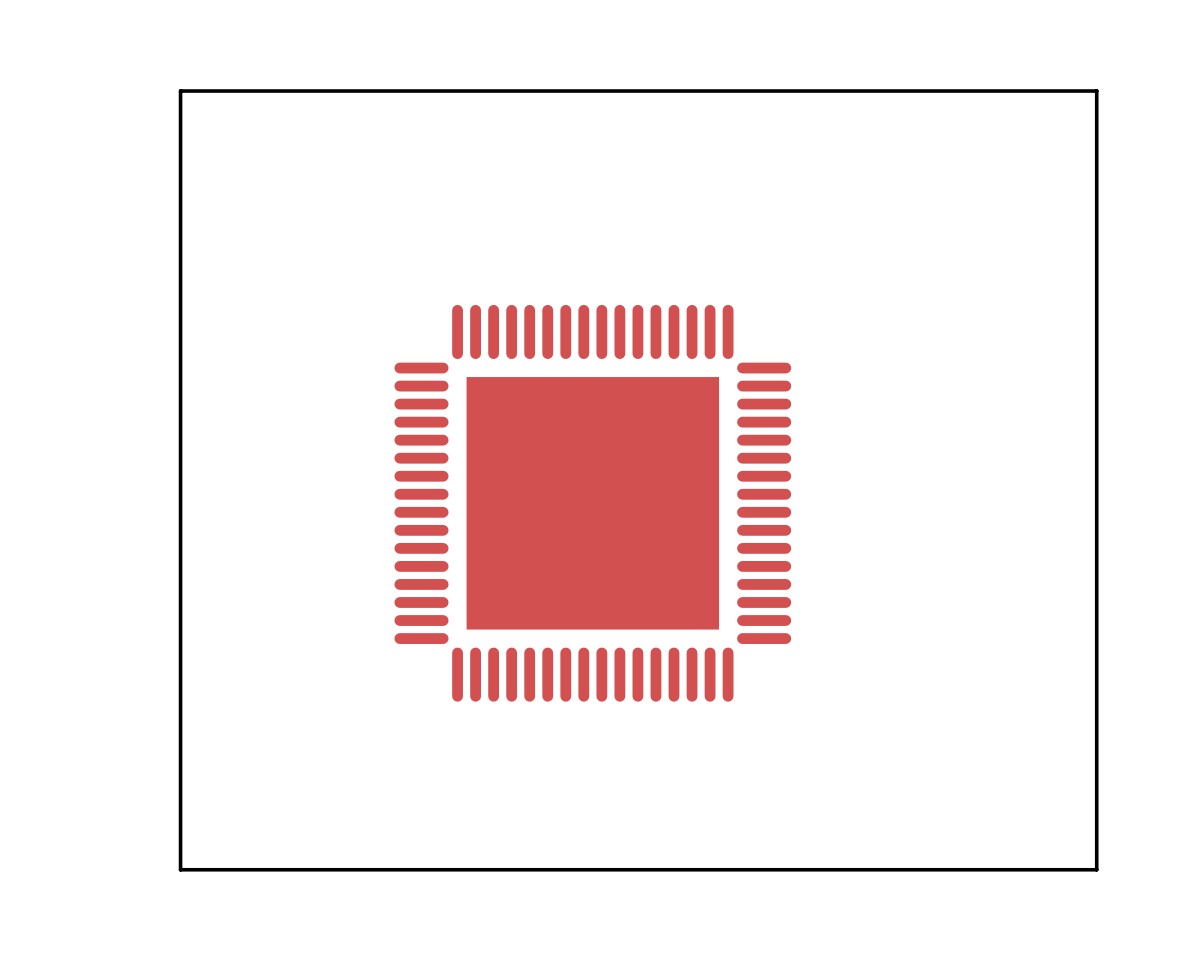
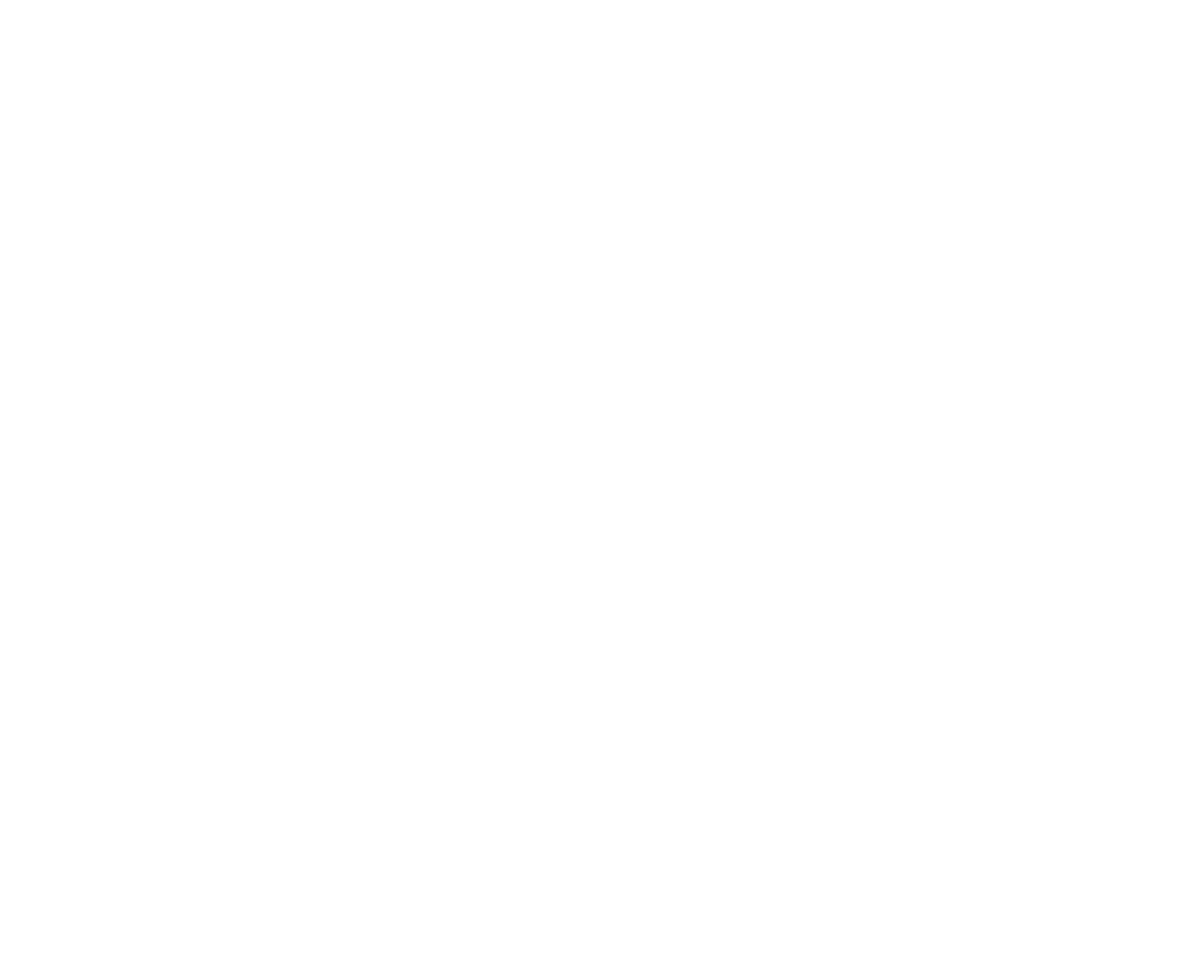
board edge: (1096, 91) (1096, 869) (180, 869) (180, 91) (1096, 91) -> none
part: (592, 503) -> none

